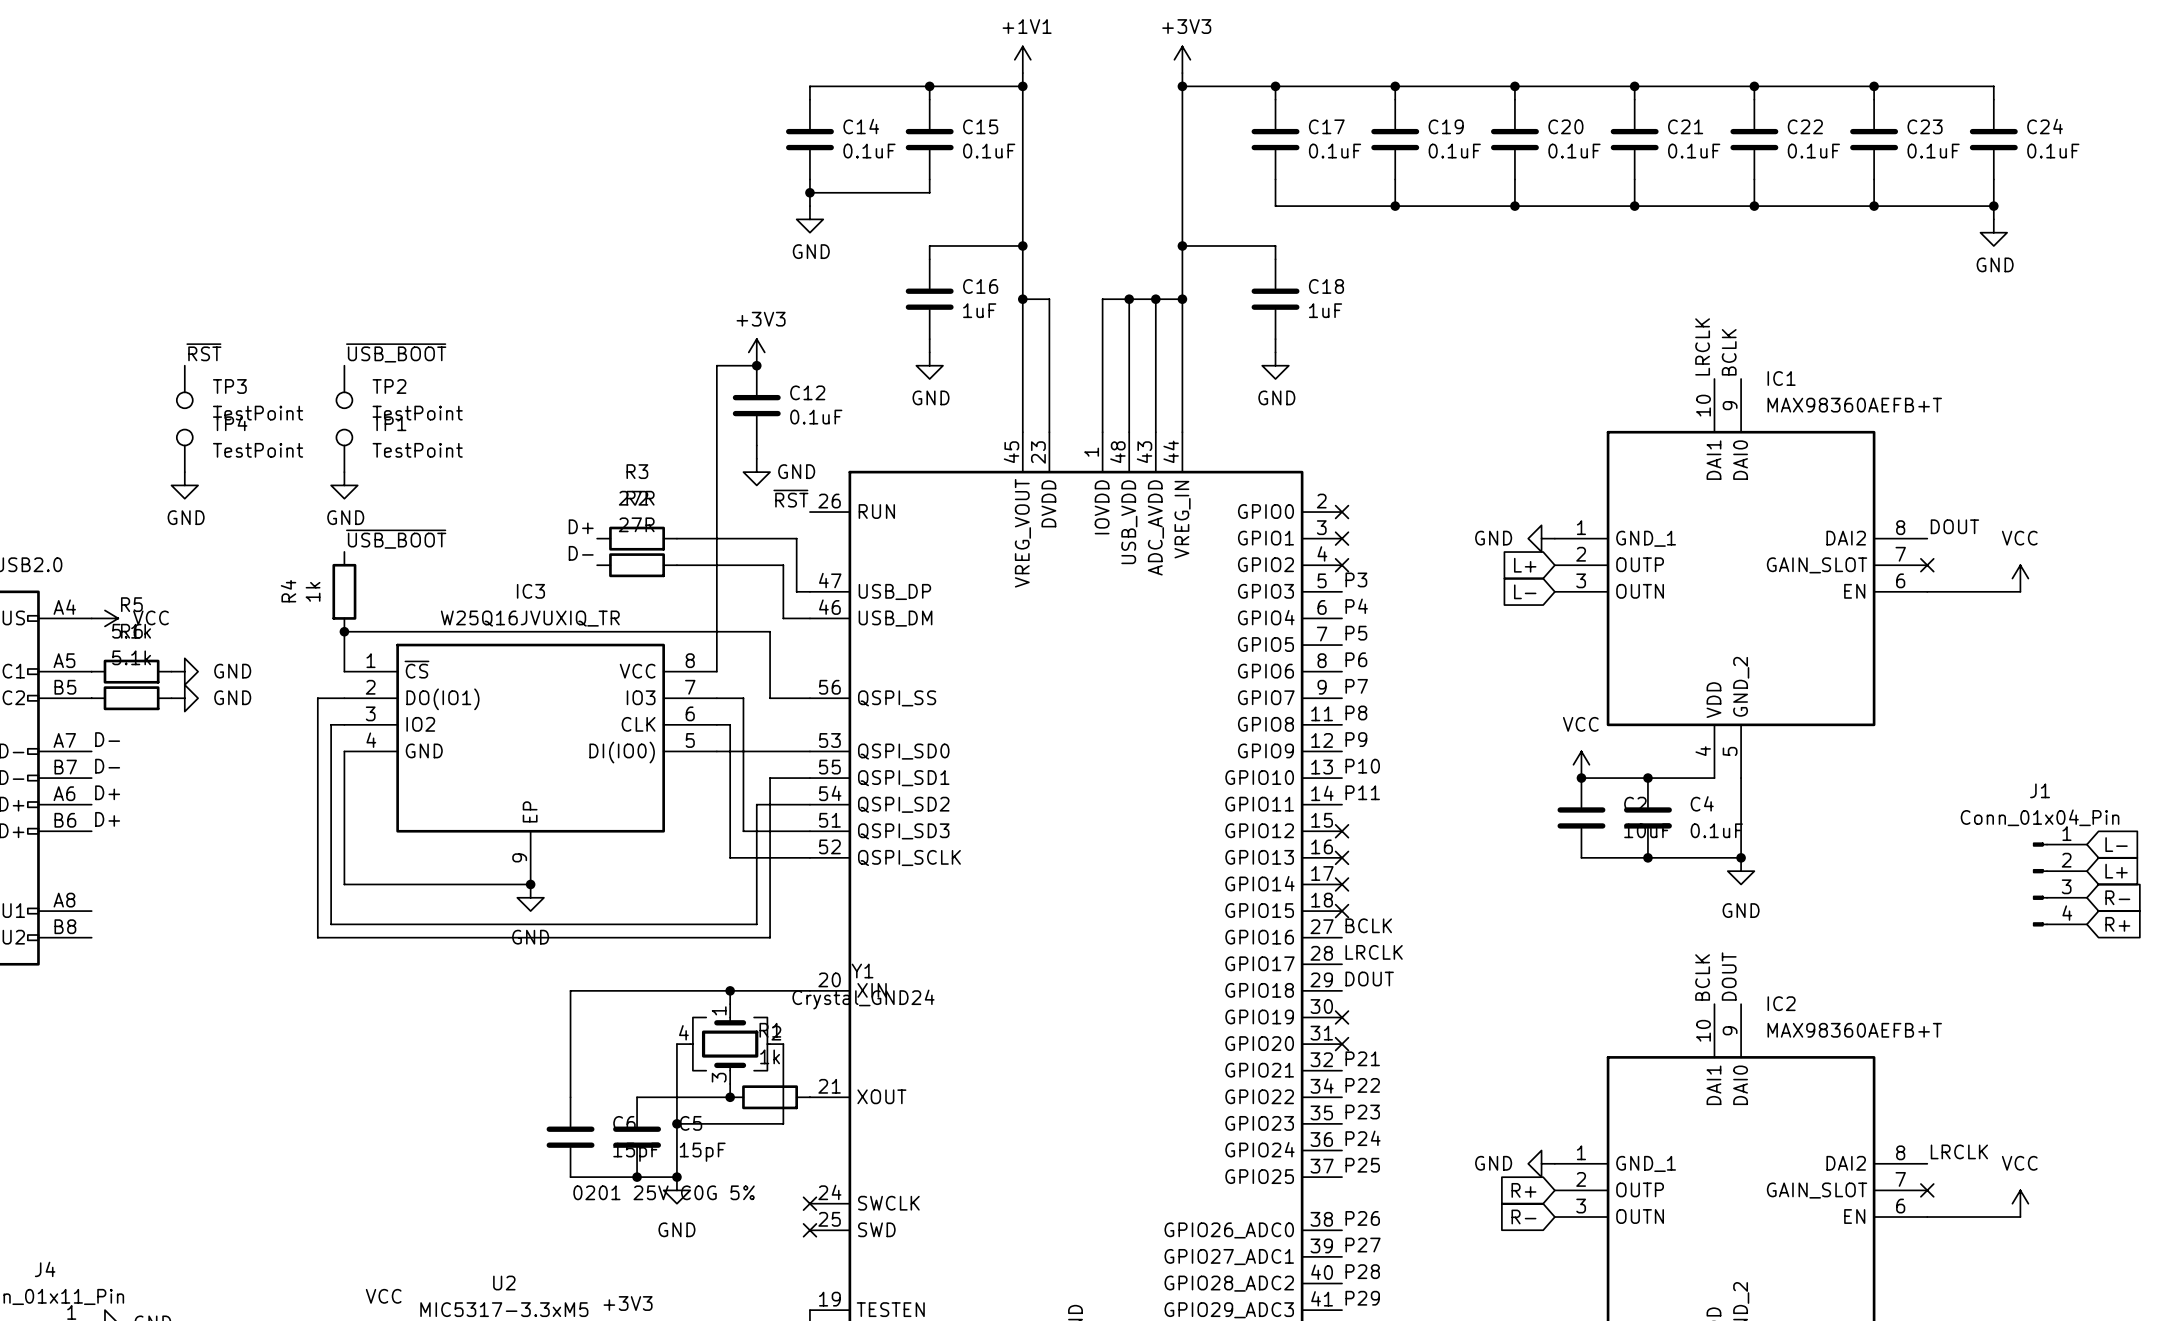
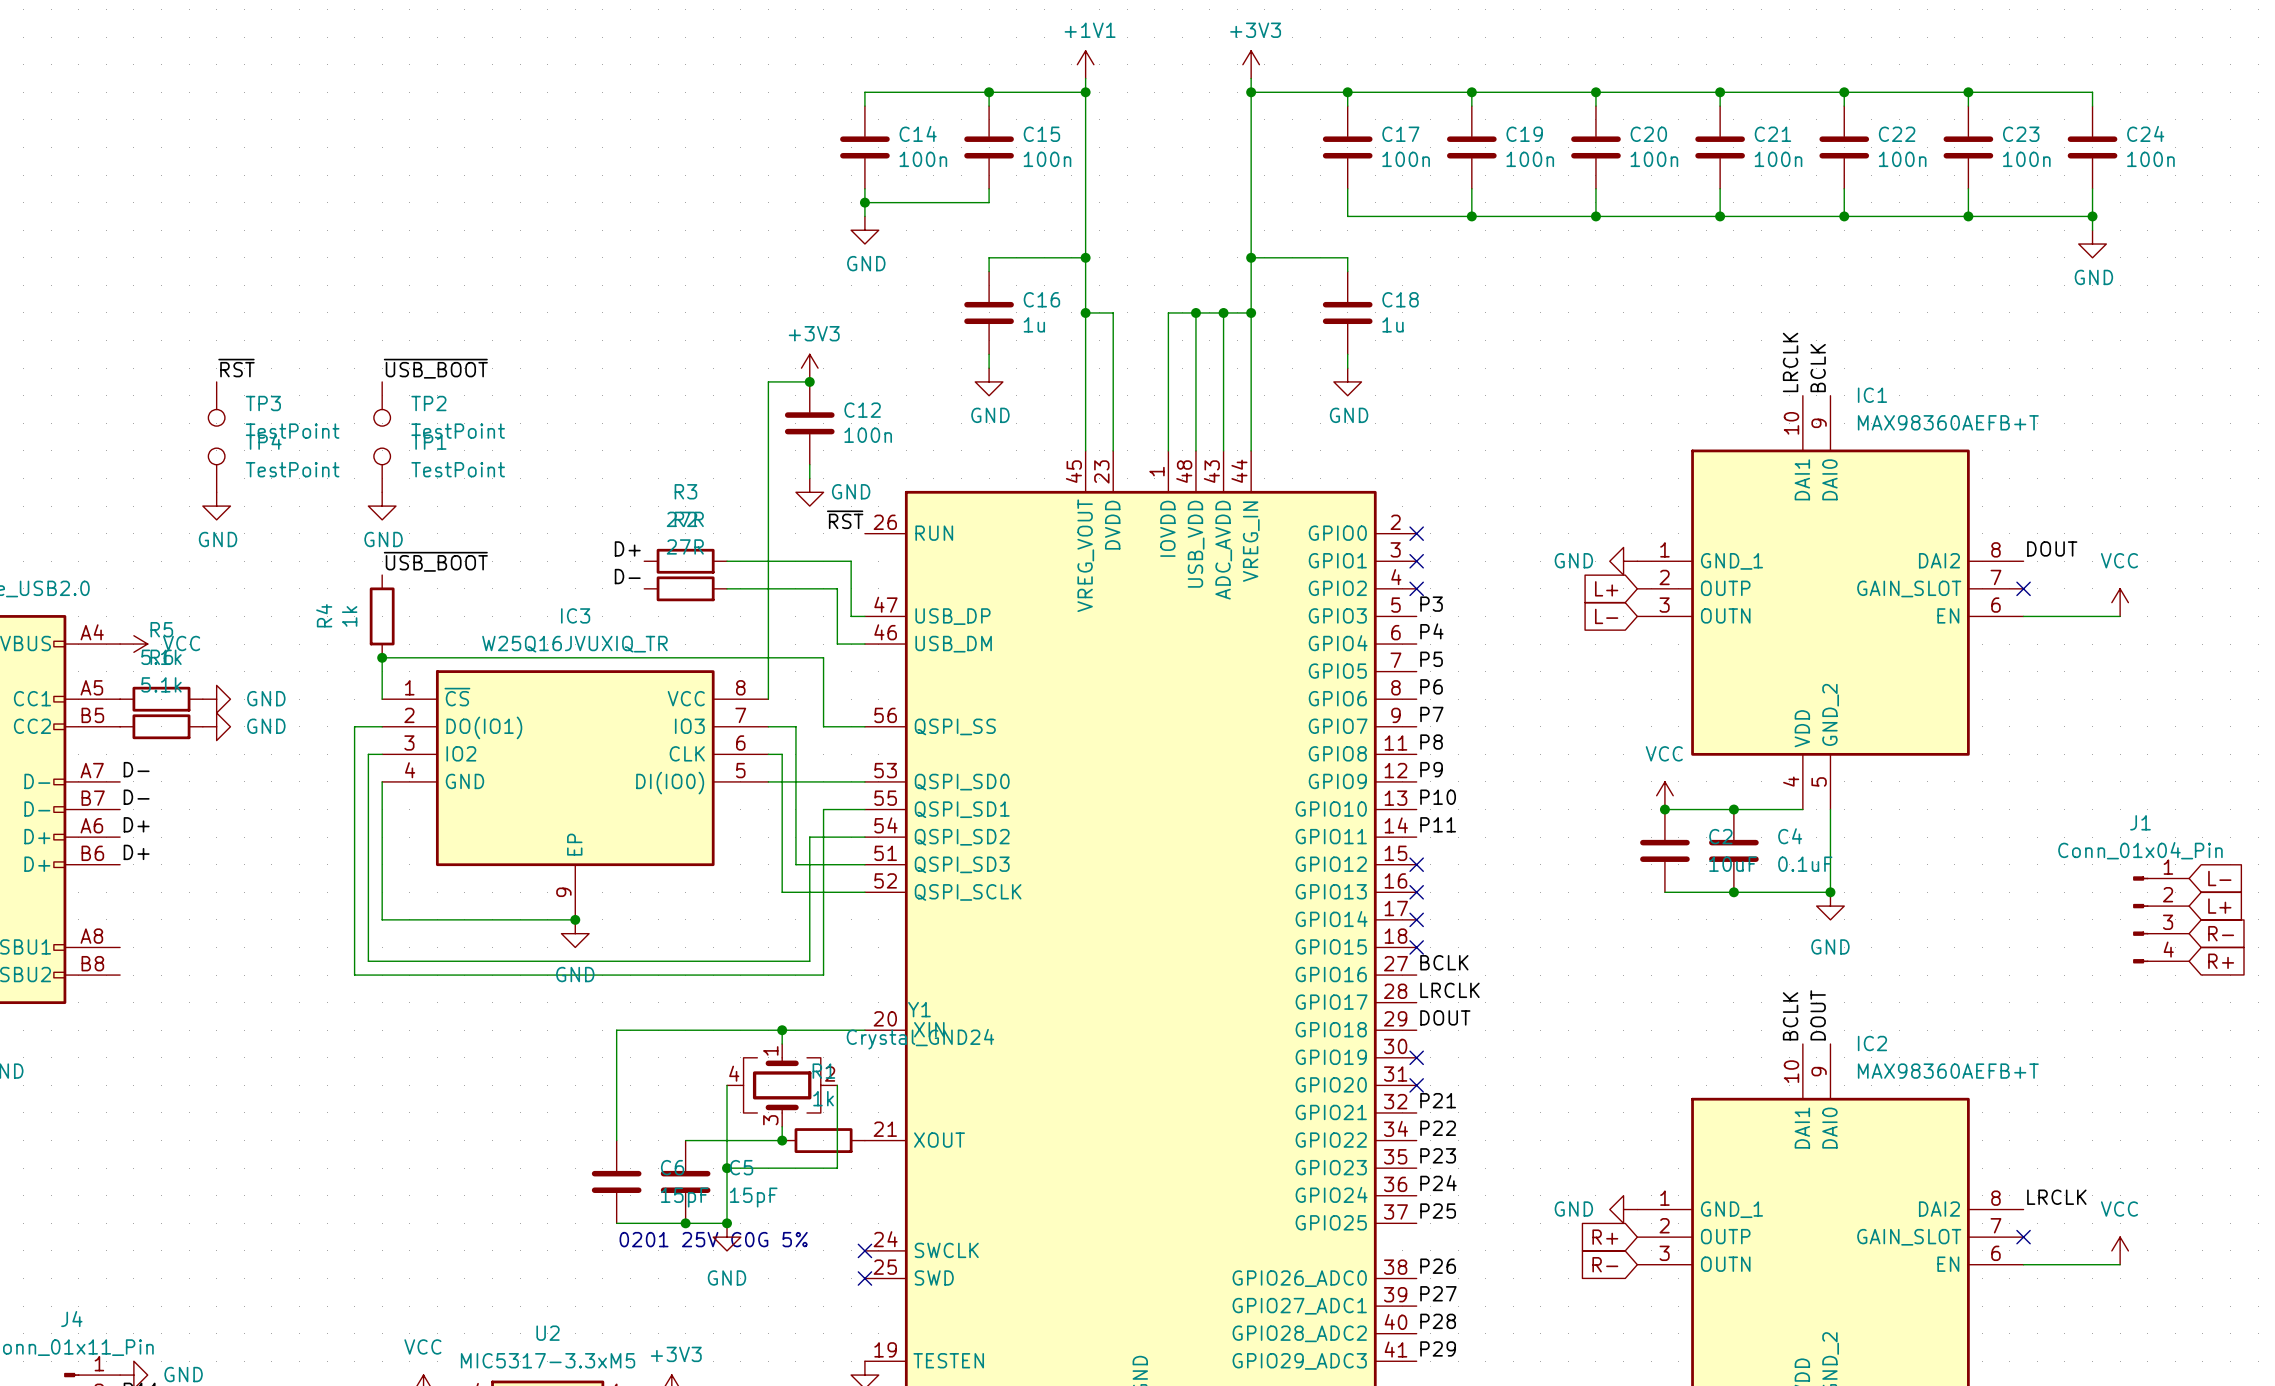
C14 value: 0.1uF (869, 151) -> 100n (923, 159)
C15 value: 0.1uF (989, 151) -> 100n (1047, 159)
C17 value: 0.1uF (1335, 151) -> 100n (1406, 159)
C19 value: 0.1uF (1454, 151) -> 100n (1530, 159)
C20 value: 0.1uF (1574, 151) -> 100n (1654, 159)
C21 value: 0.1uF (1694, 151) -> 100n (1778, 159)
C22 value: 0.1uF (1813, 151) -> 100n (1902, 159)
C23 value: 0.1uF (1933, 151) -> 100n (2026, 159)
C24 value: 0.1uF (2053, 151) -> 100n (2150, 159)
C16 value: 1uF (979, 310) -> 1u (1034, 324)
C18 value: 1uF (1325, 310) -> 1u (1392, 324)
C12 value: 0.1uF (816, 417) -> 100n (868, 435)

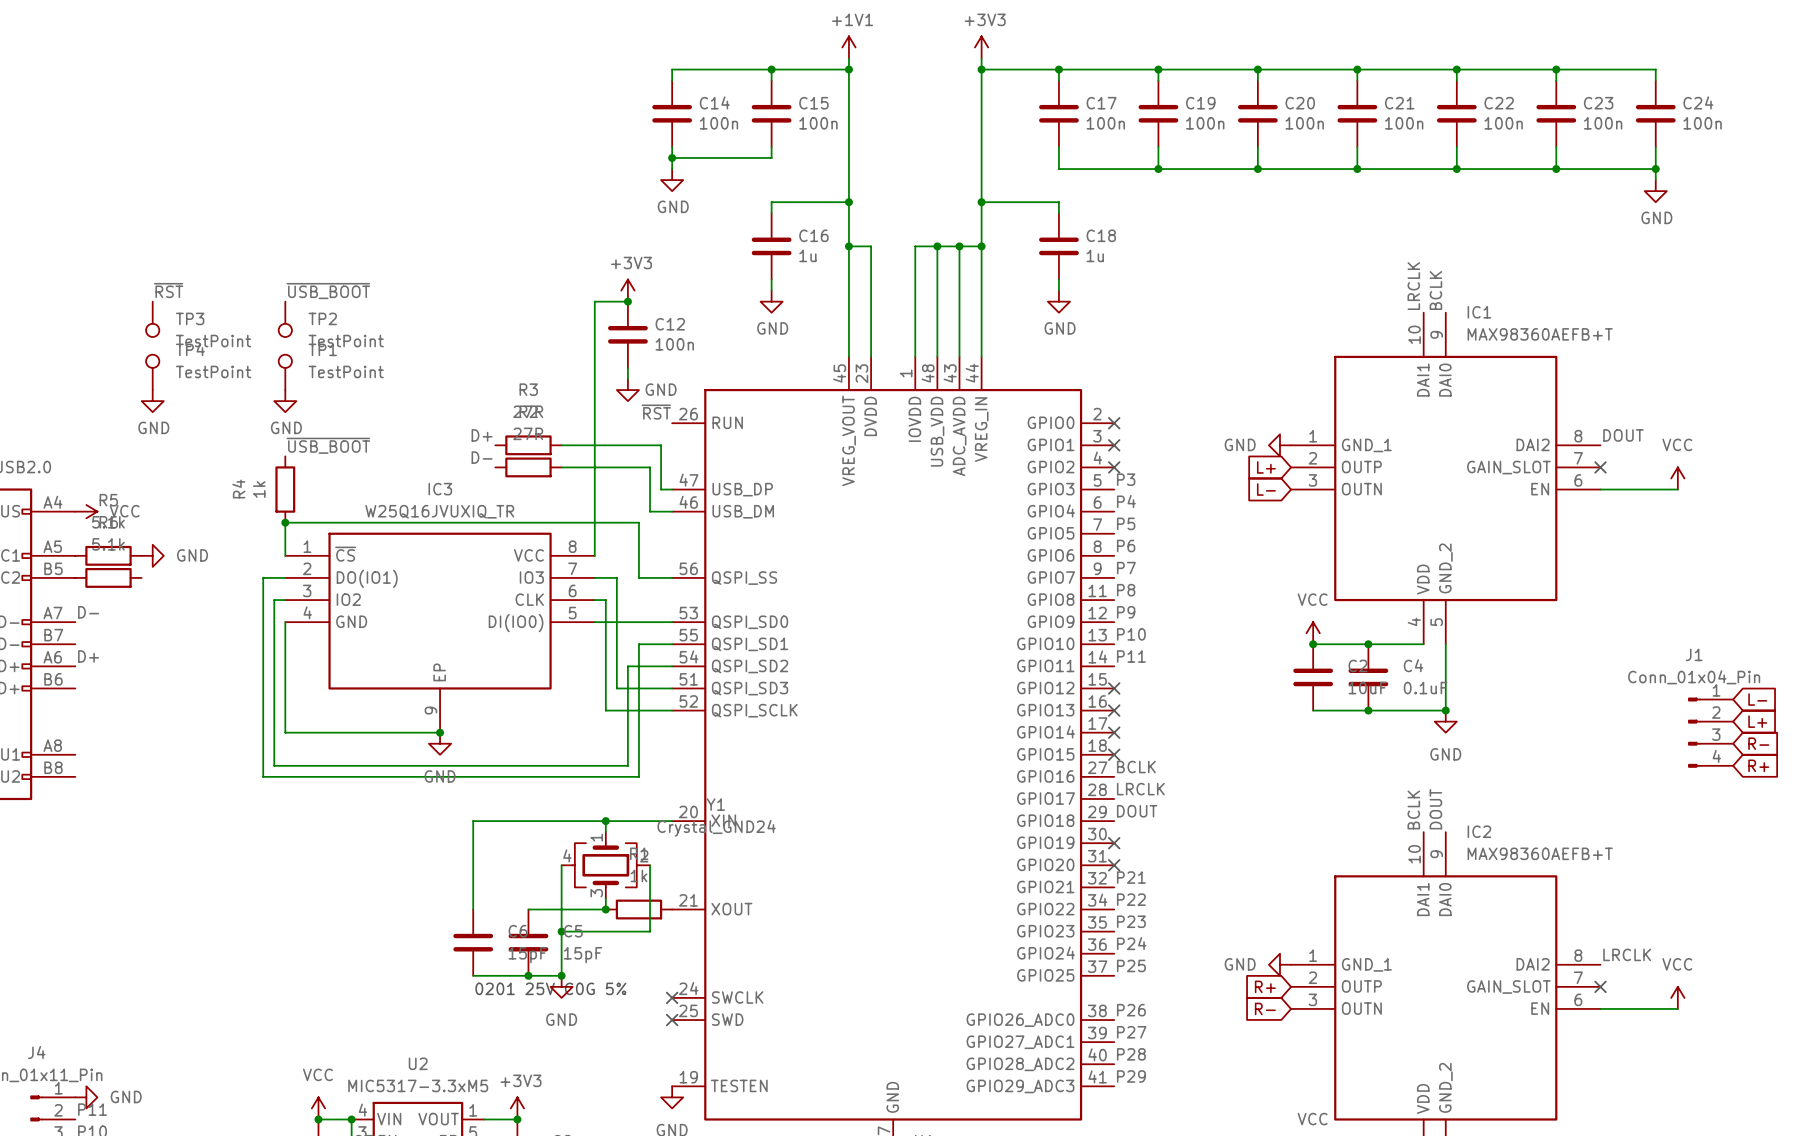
power symbol: GND (216, 726) -> none
label: D- (136, 797) -> none
label: D+ (136, 852) -> none

